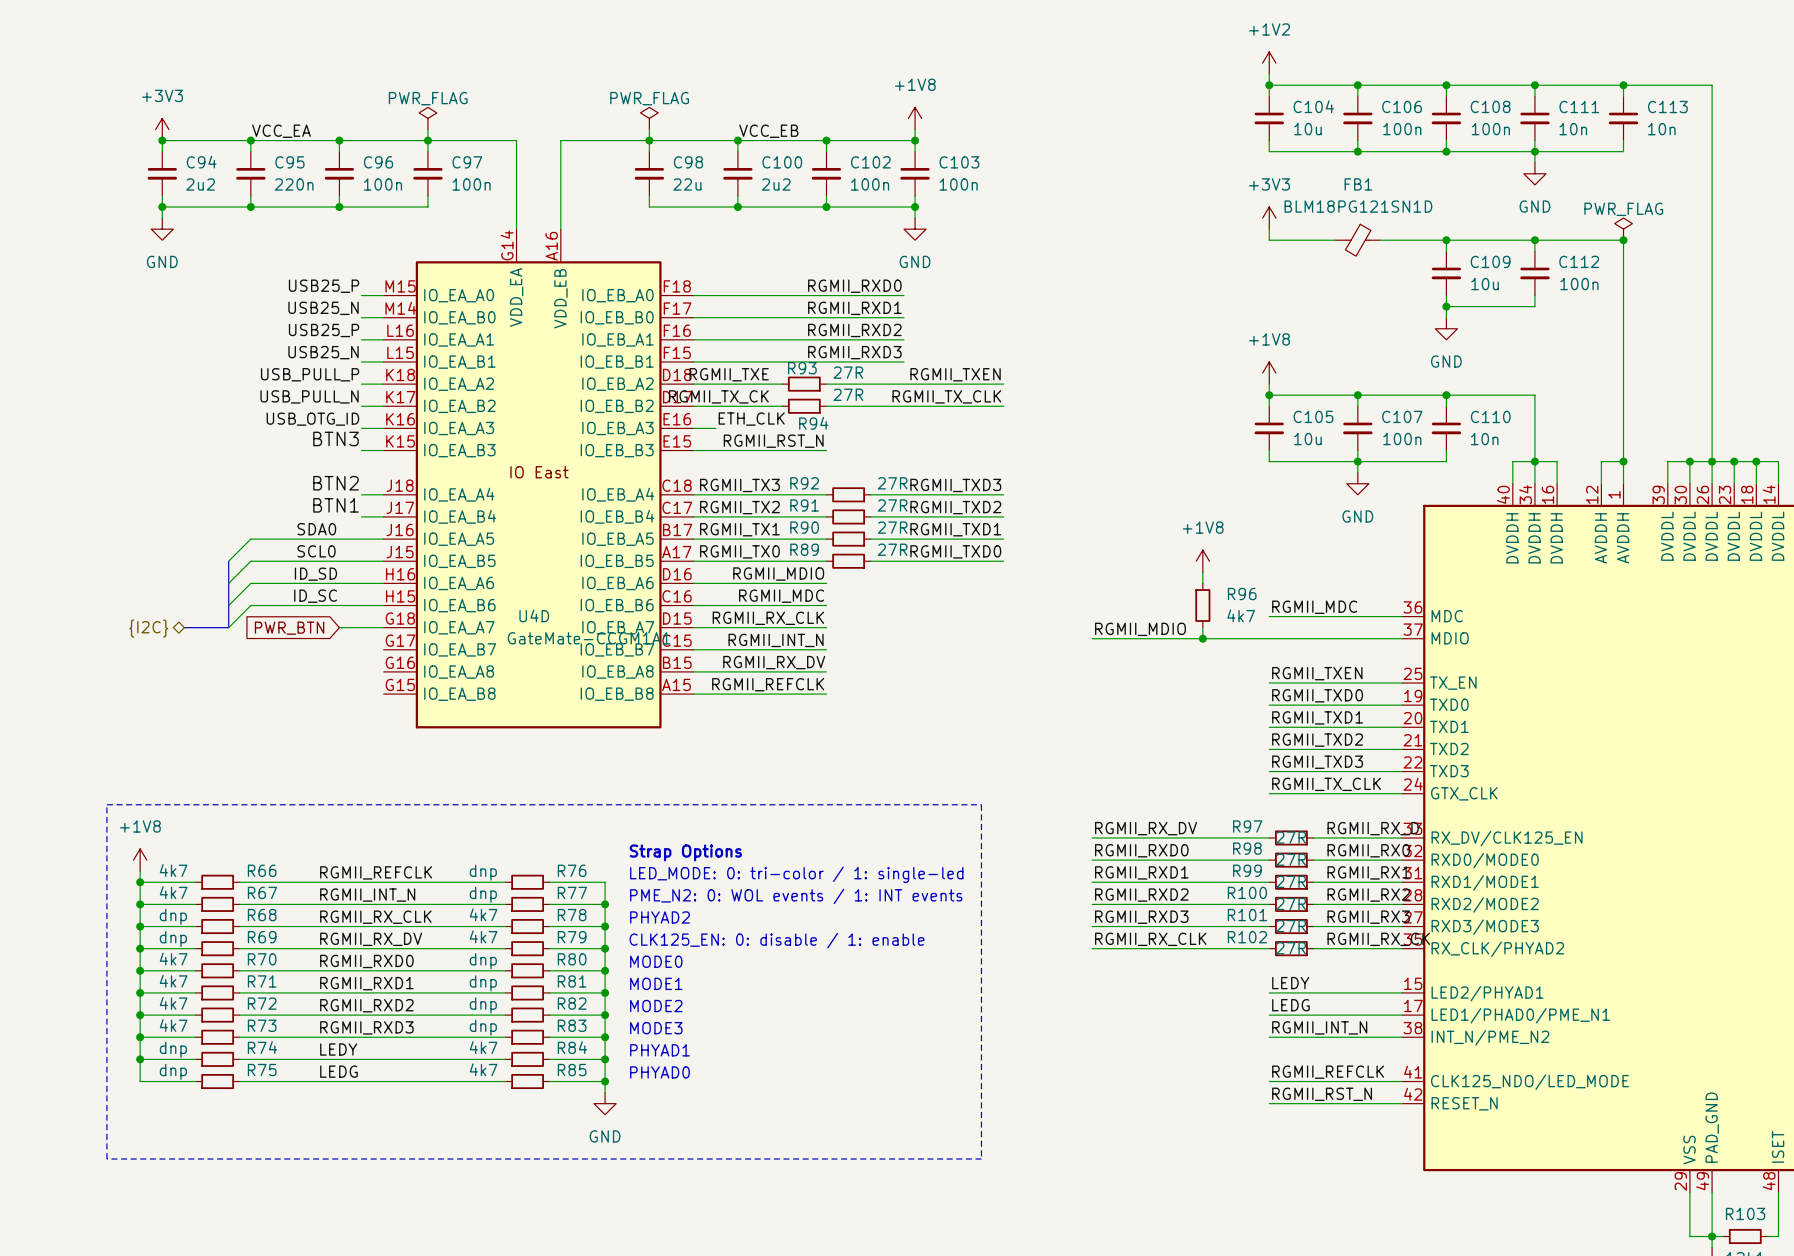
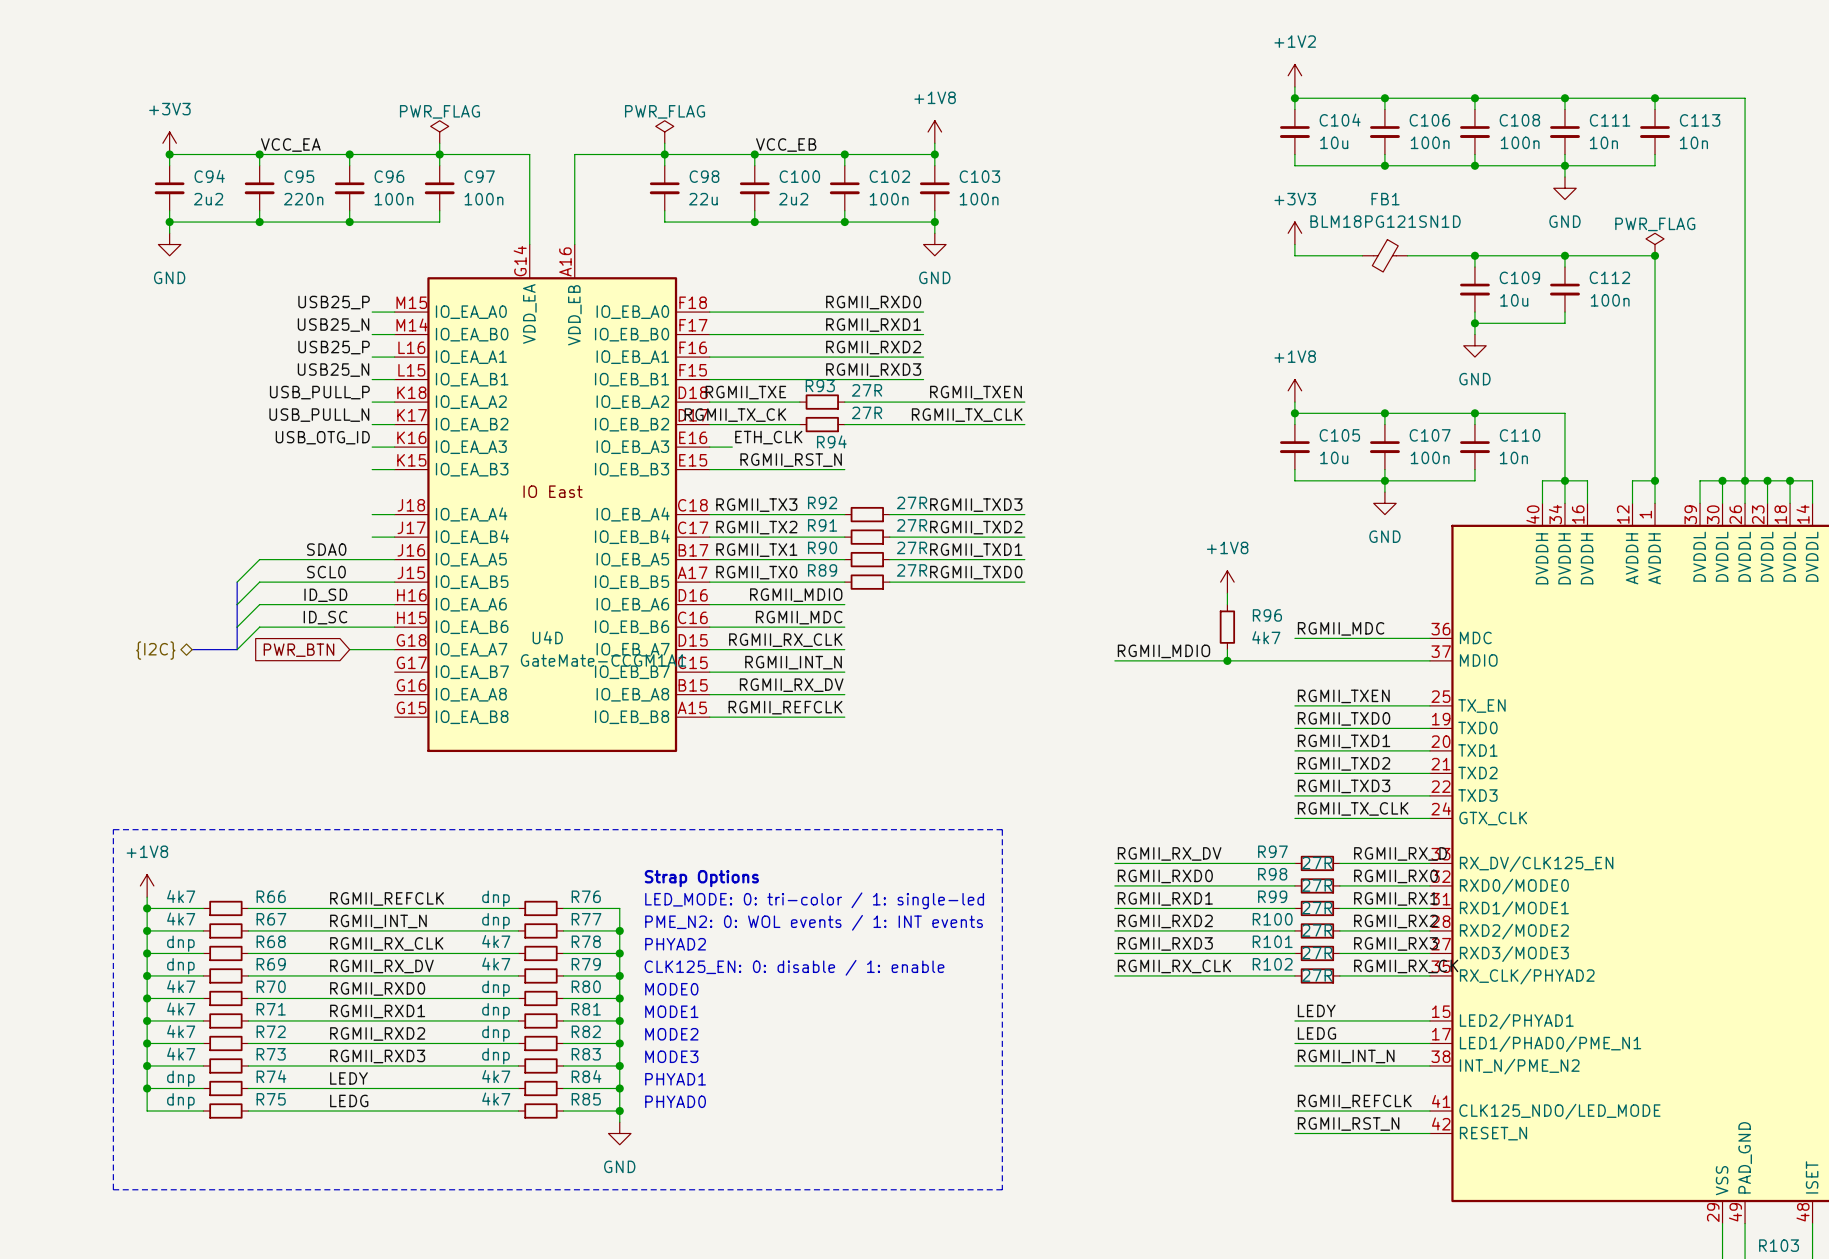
label: BTN3 (336, 438) -> none
label: BTN2 (336, 483) -> none
label: BTN1 (336, 505) -> none

